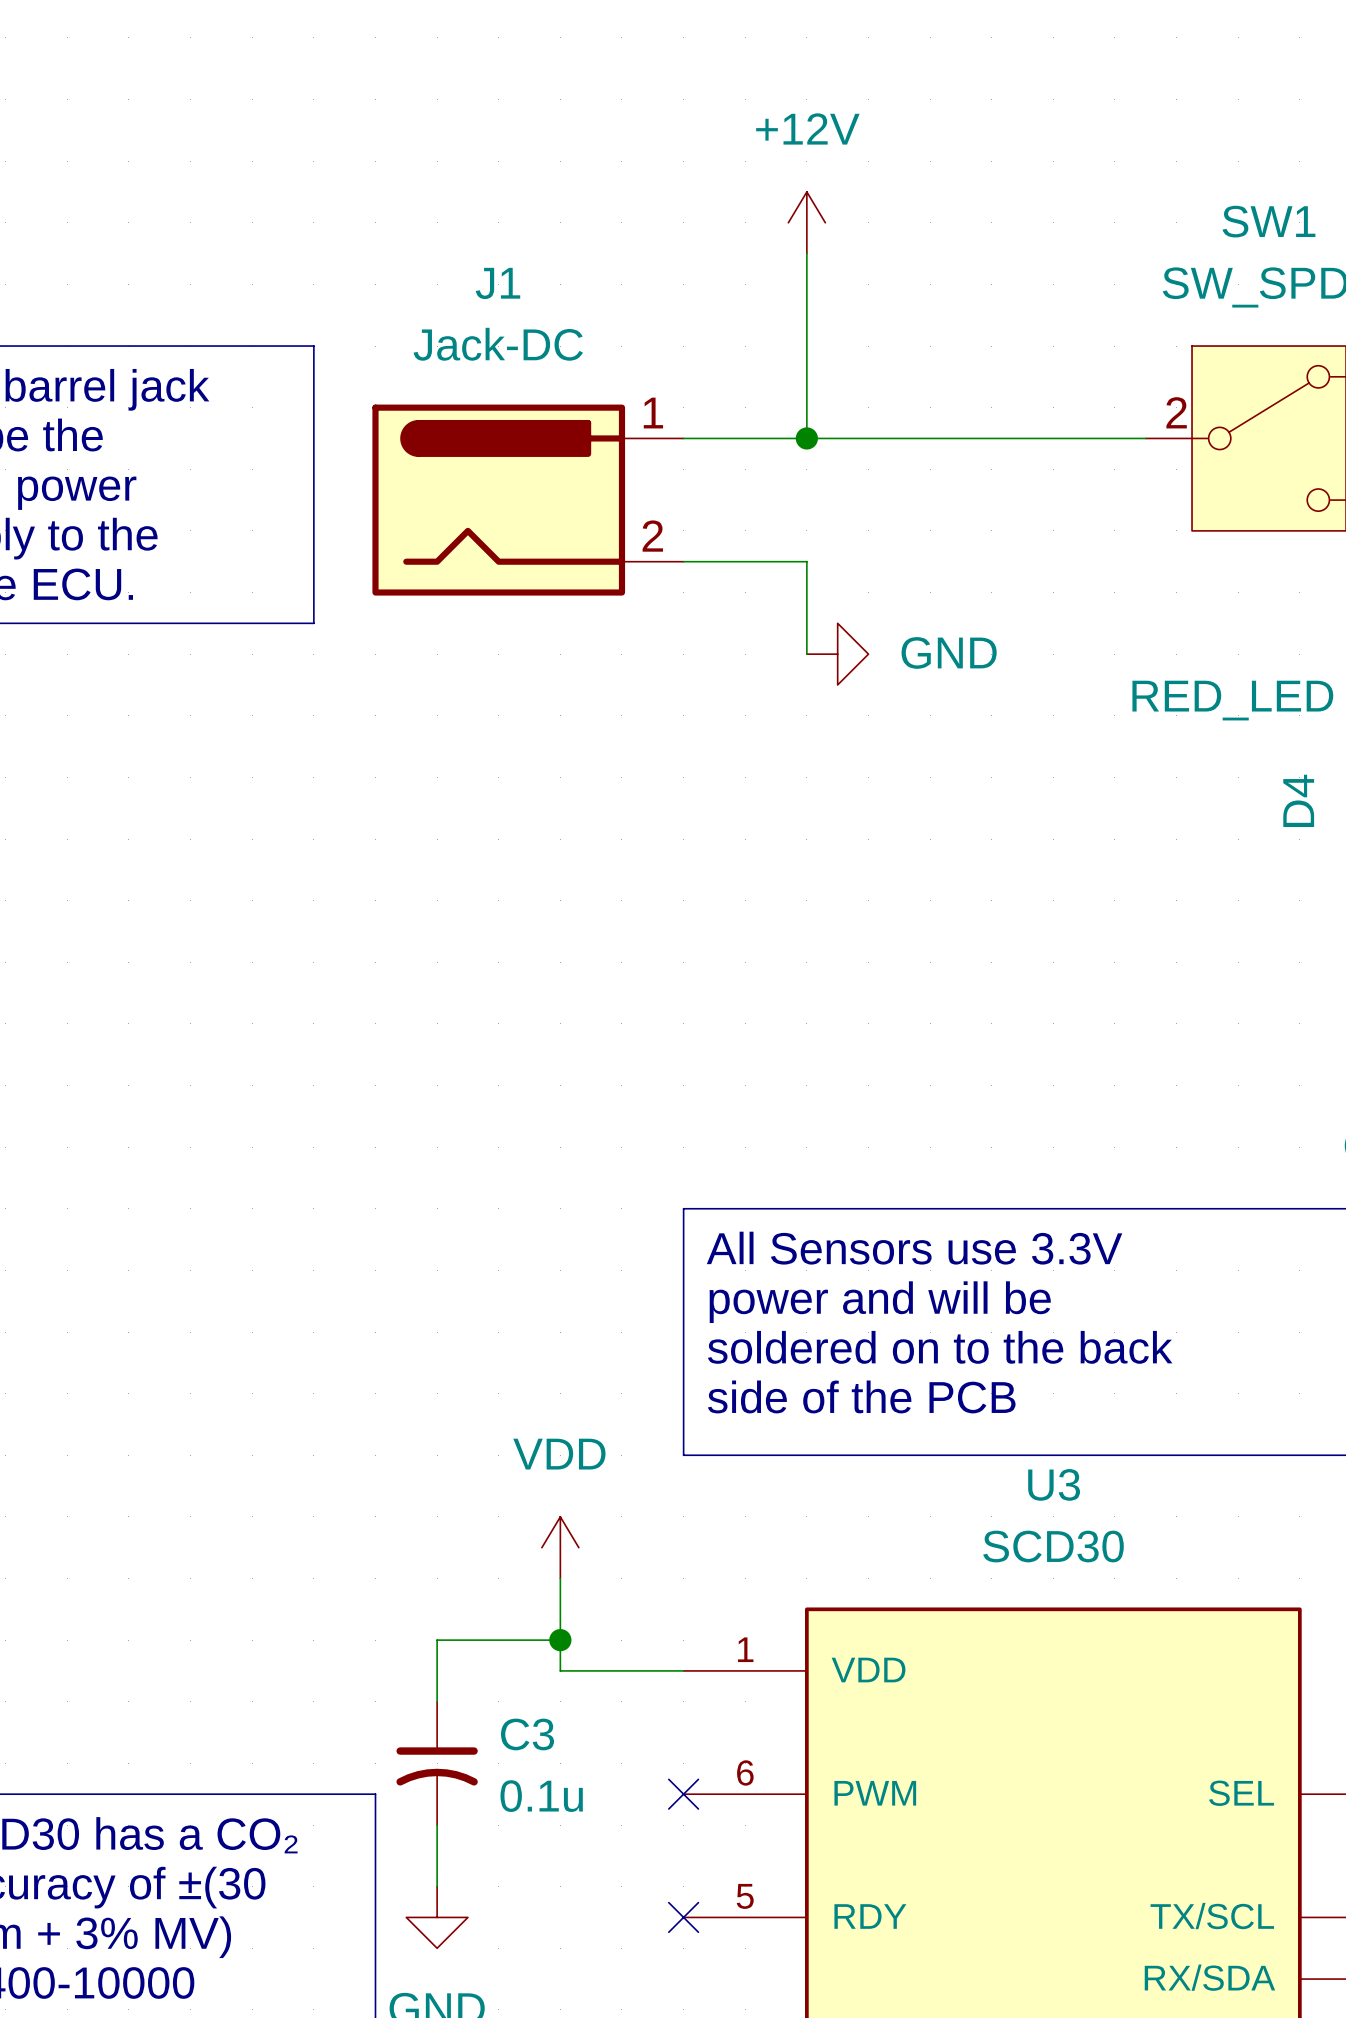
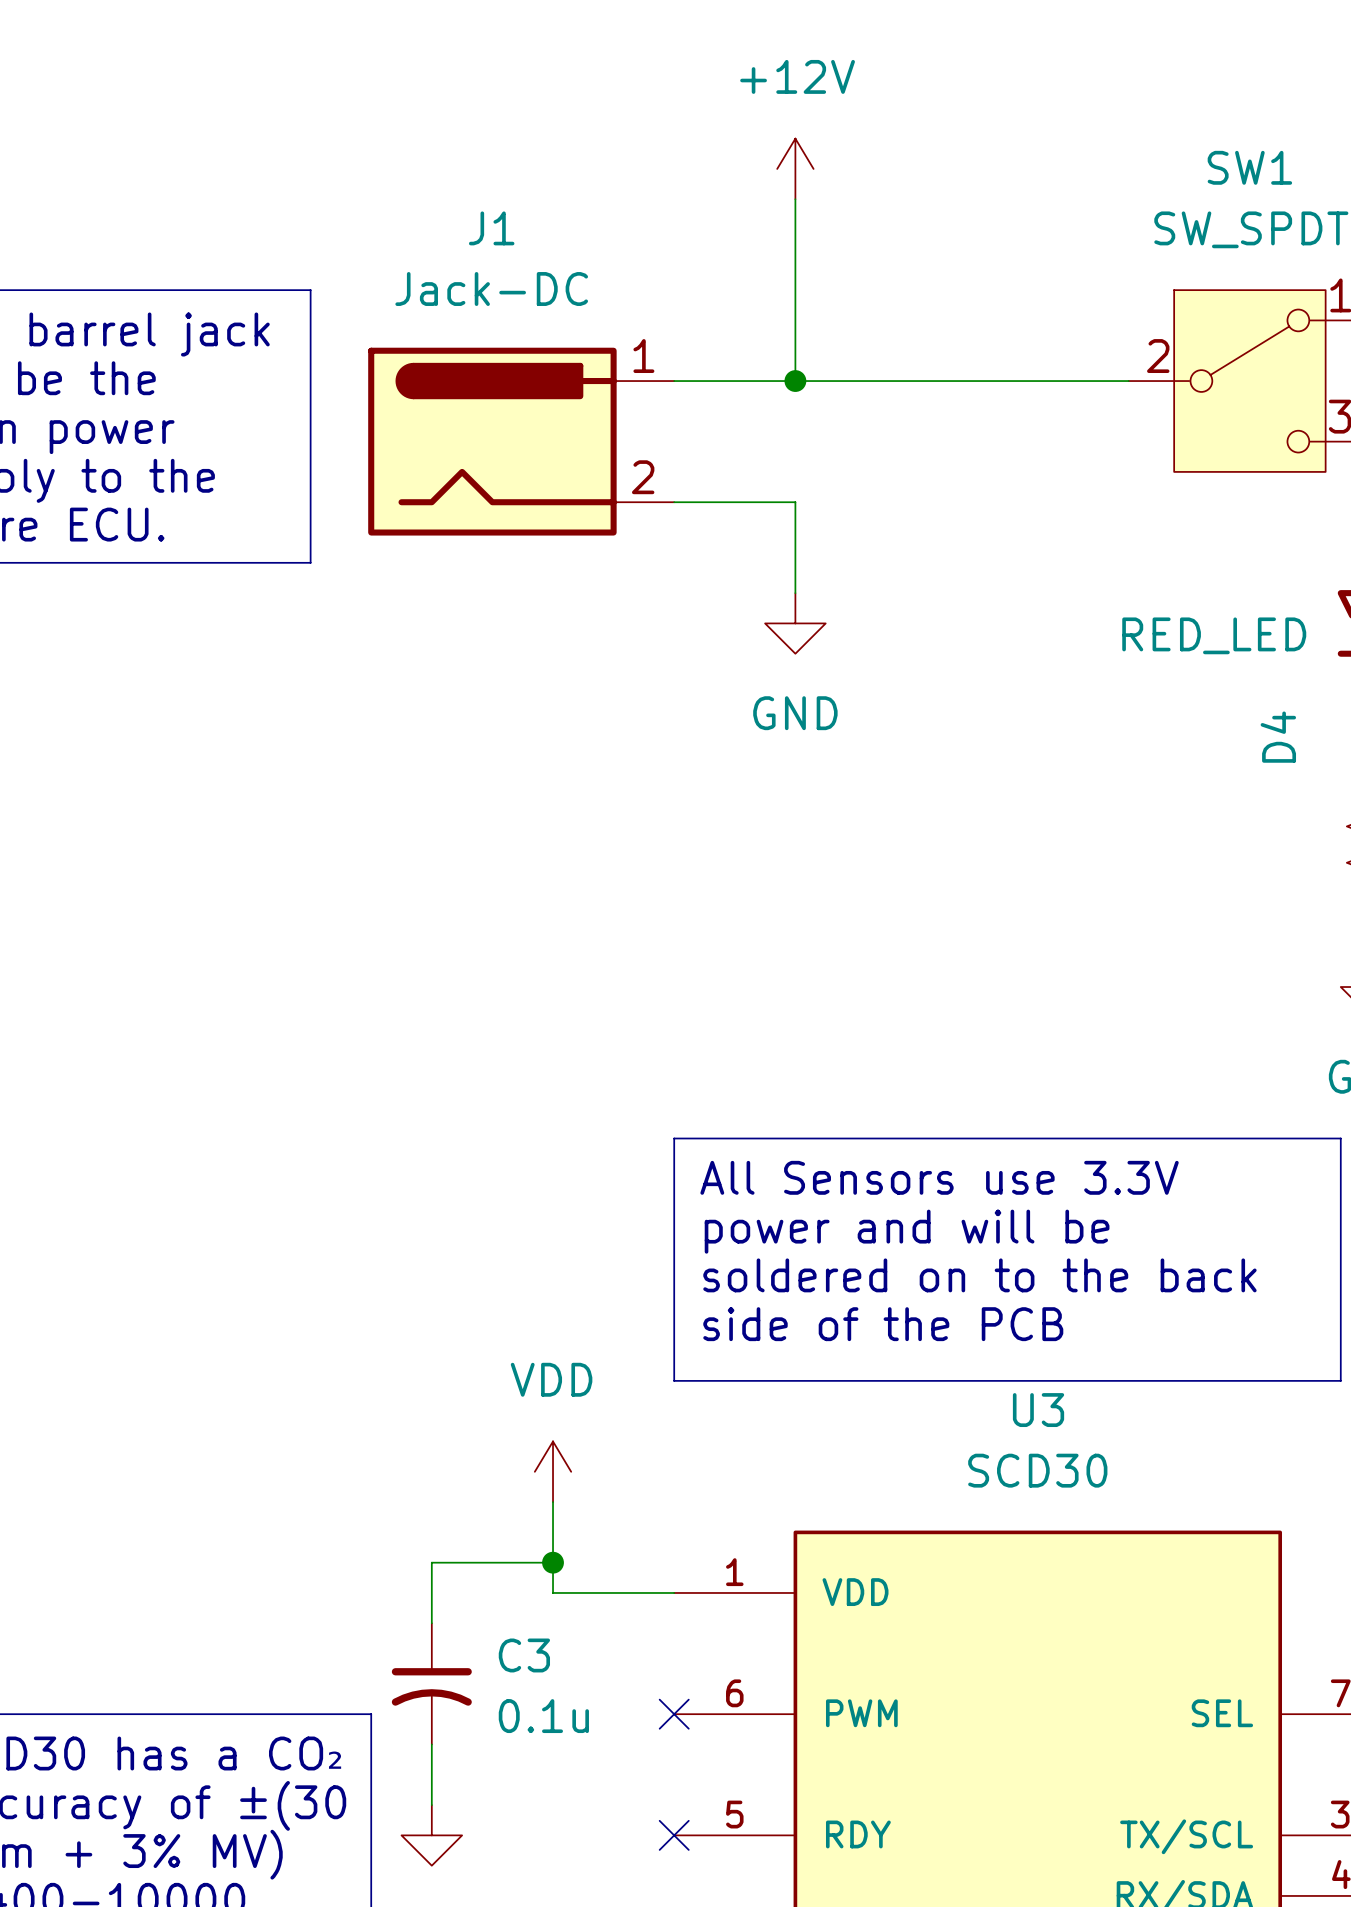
power symbol rotation: 0° (837, 654) -> 90° clockwise (795, 623)
power symbol position: GND (837, 654) -> GND (795, 623)

